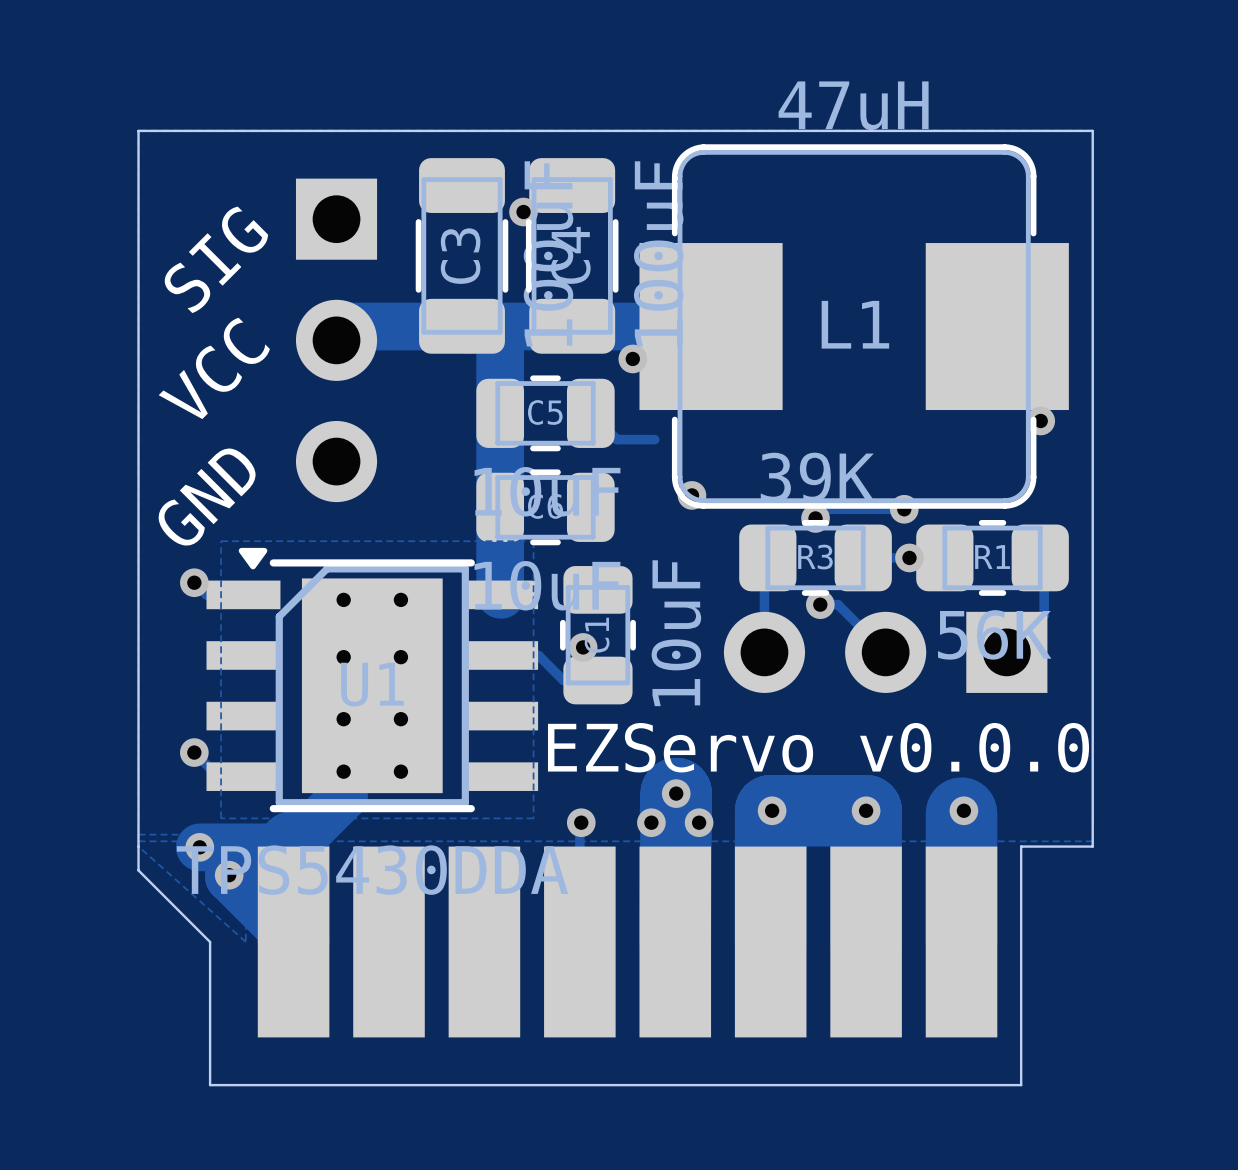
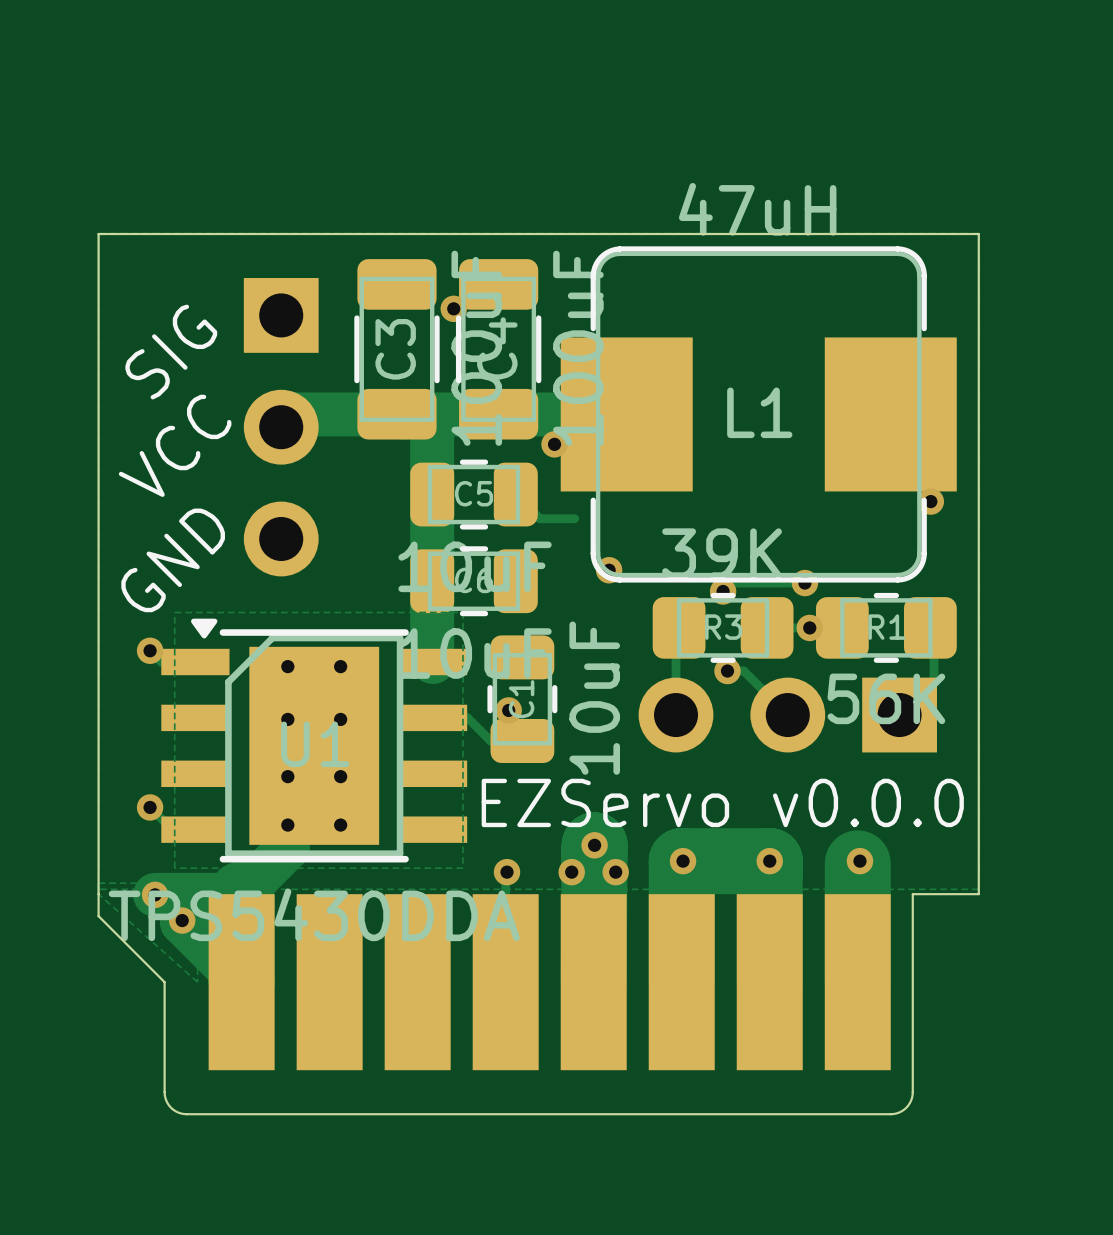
part footprint: [137, 845, 1023, 1087] -> [97, 893, 914, 1116]

